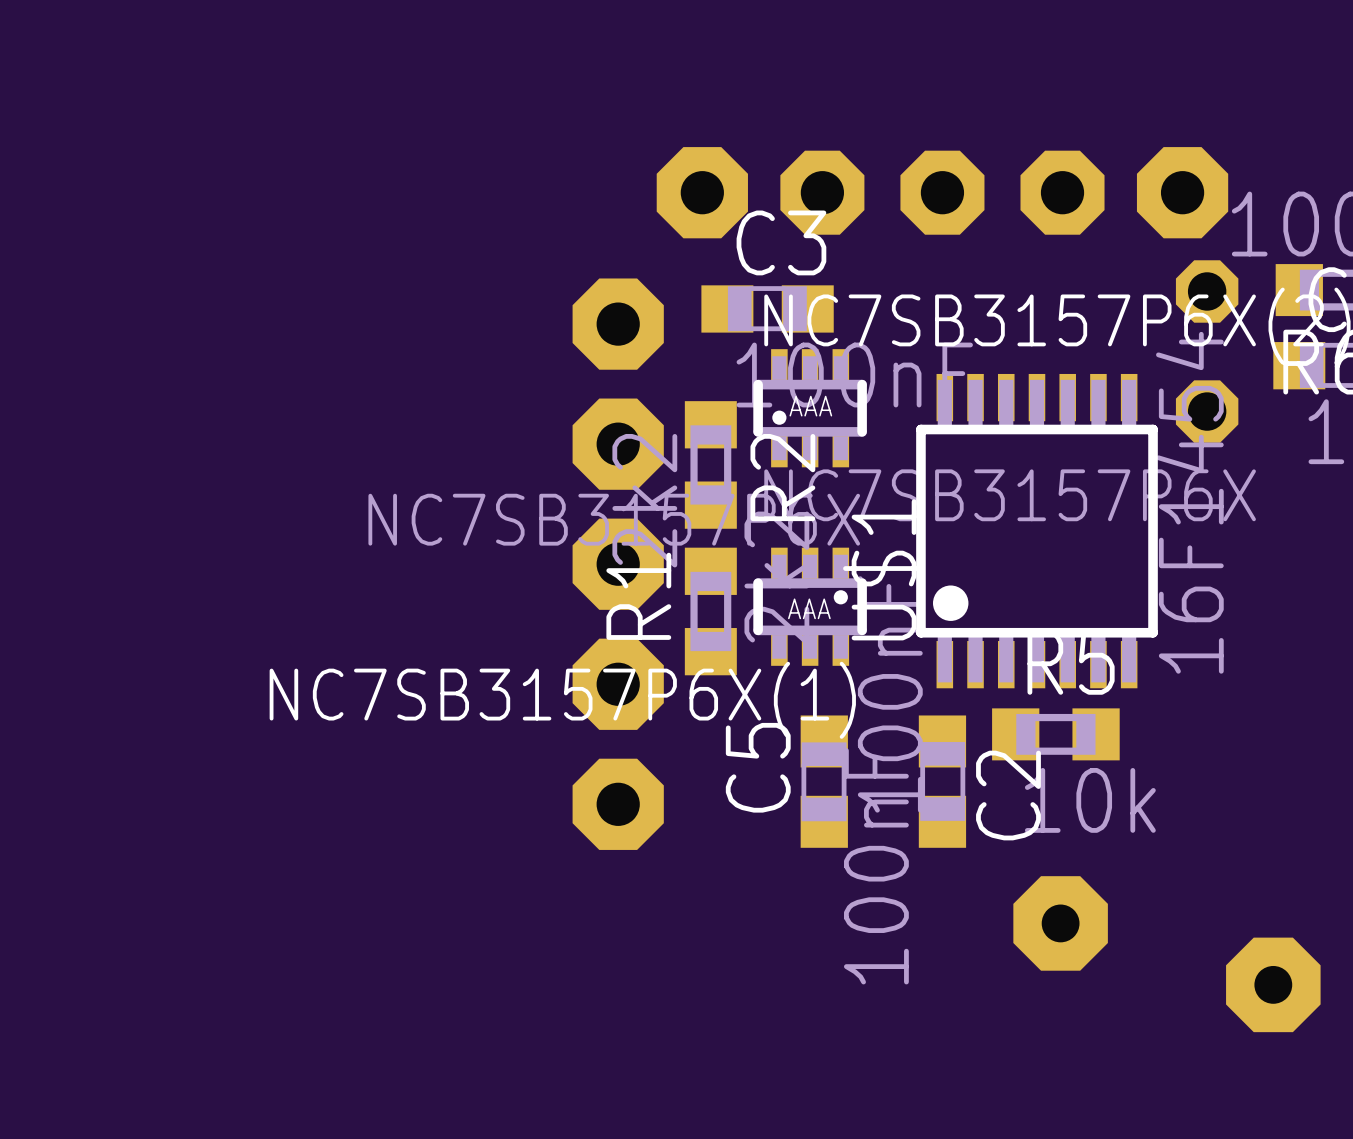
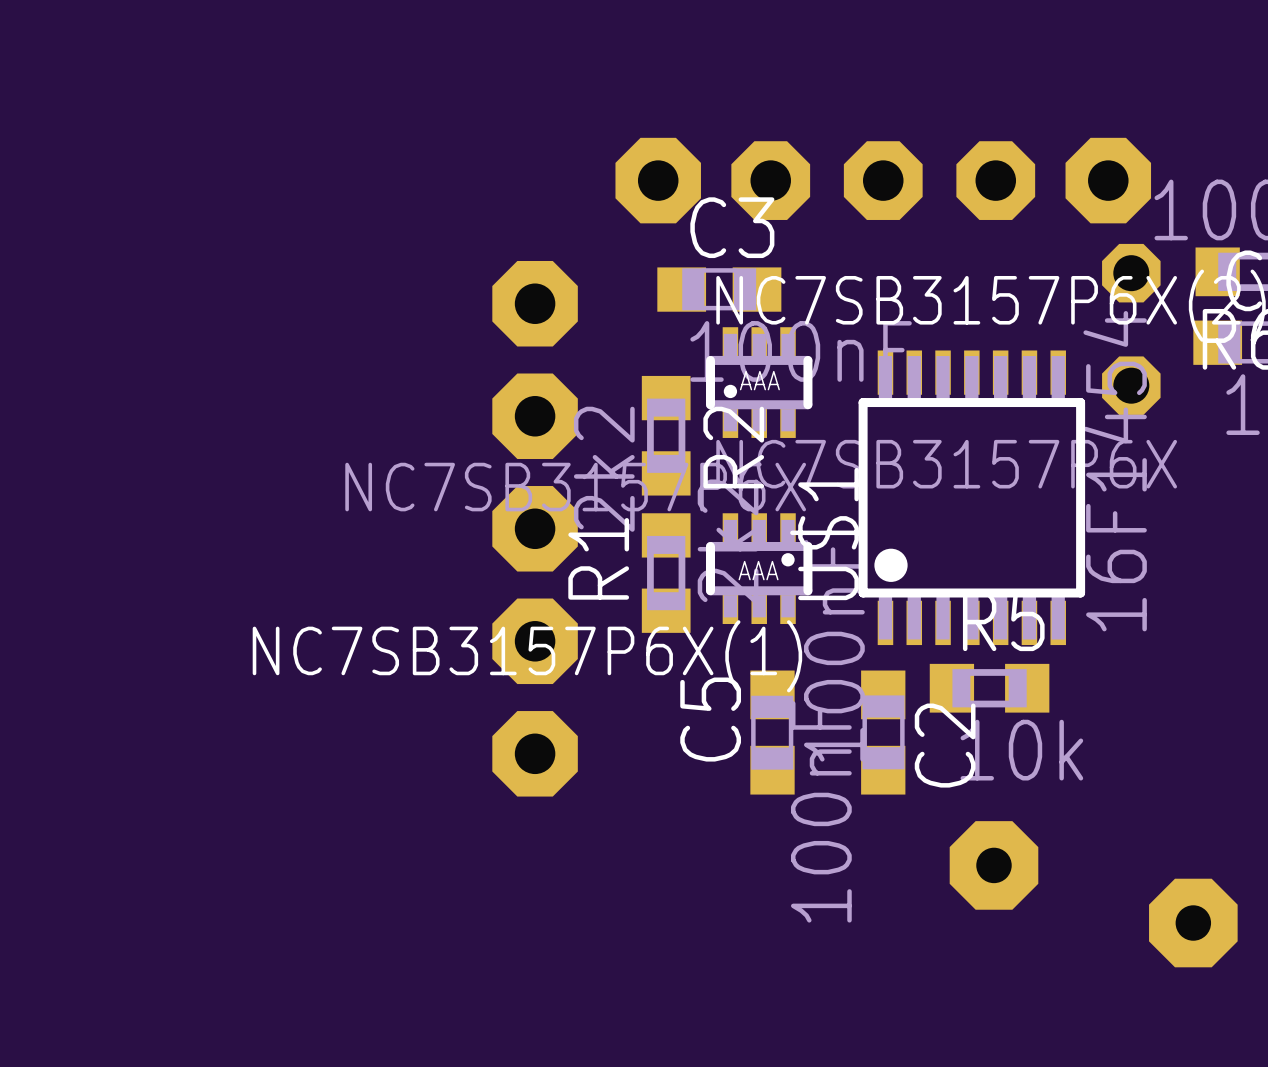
part position: (618, 564) -> (535, 528)

